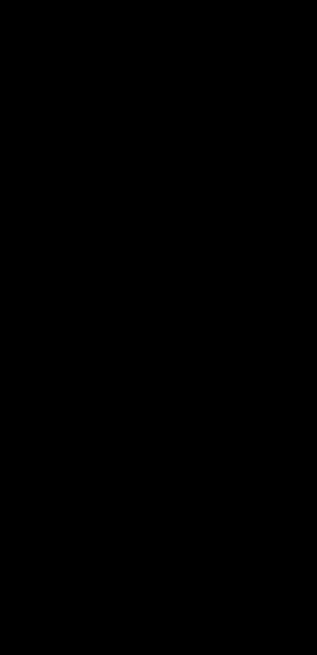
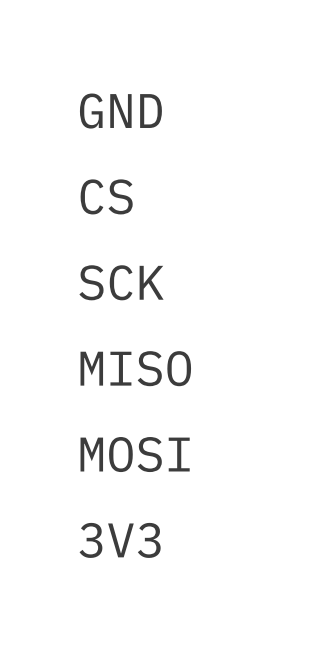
text: none -> GND (120, 111)
text: none -> CS (106, 196)
text: none -> SCK (121, 282)
text: none -> MISO (135, 368)
text: none -> MOSI (135, 454)
text: none -> 3V3 (120, 540)

